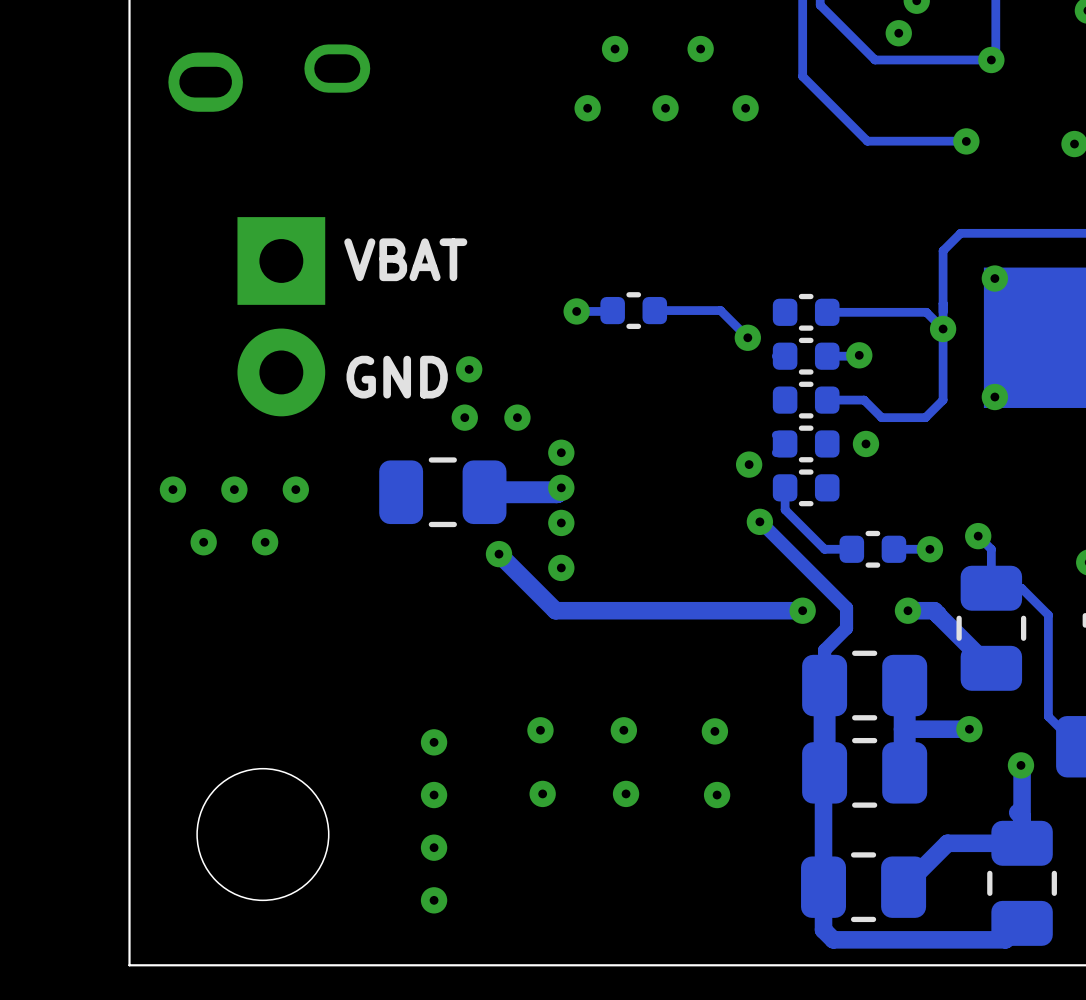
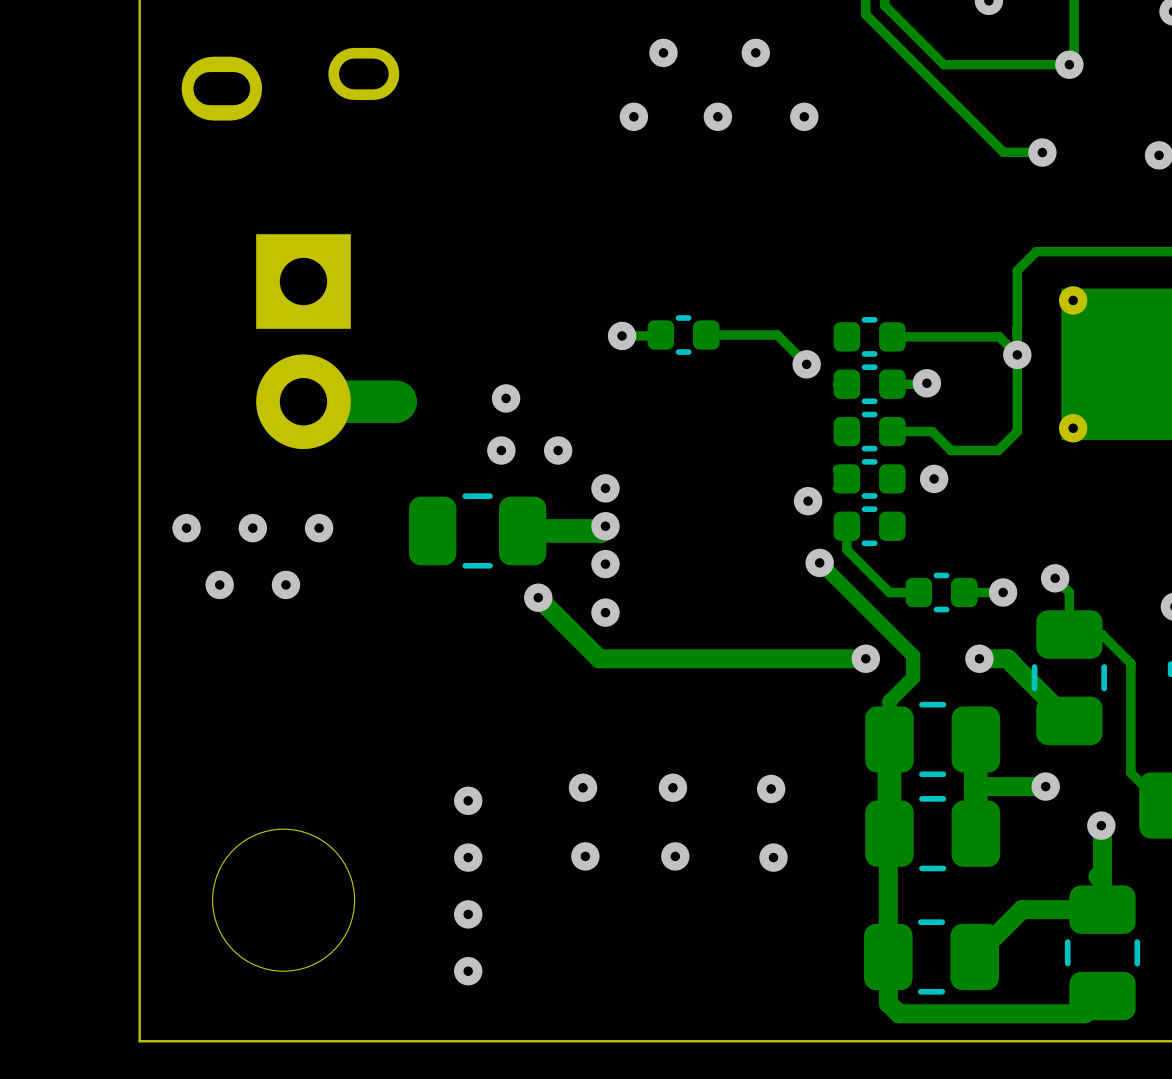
track: (802, 13) (802, 76) (867, 141) (930, 141) -> (865, 14) (1003, 152)
via: (898, 33) -> none
text: VBAT (405, 259) -> none
track: none -> (395, 401) (303, 401)
text: GND (397, 377) -> none

